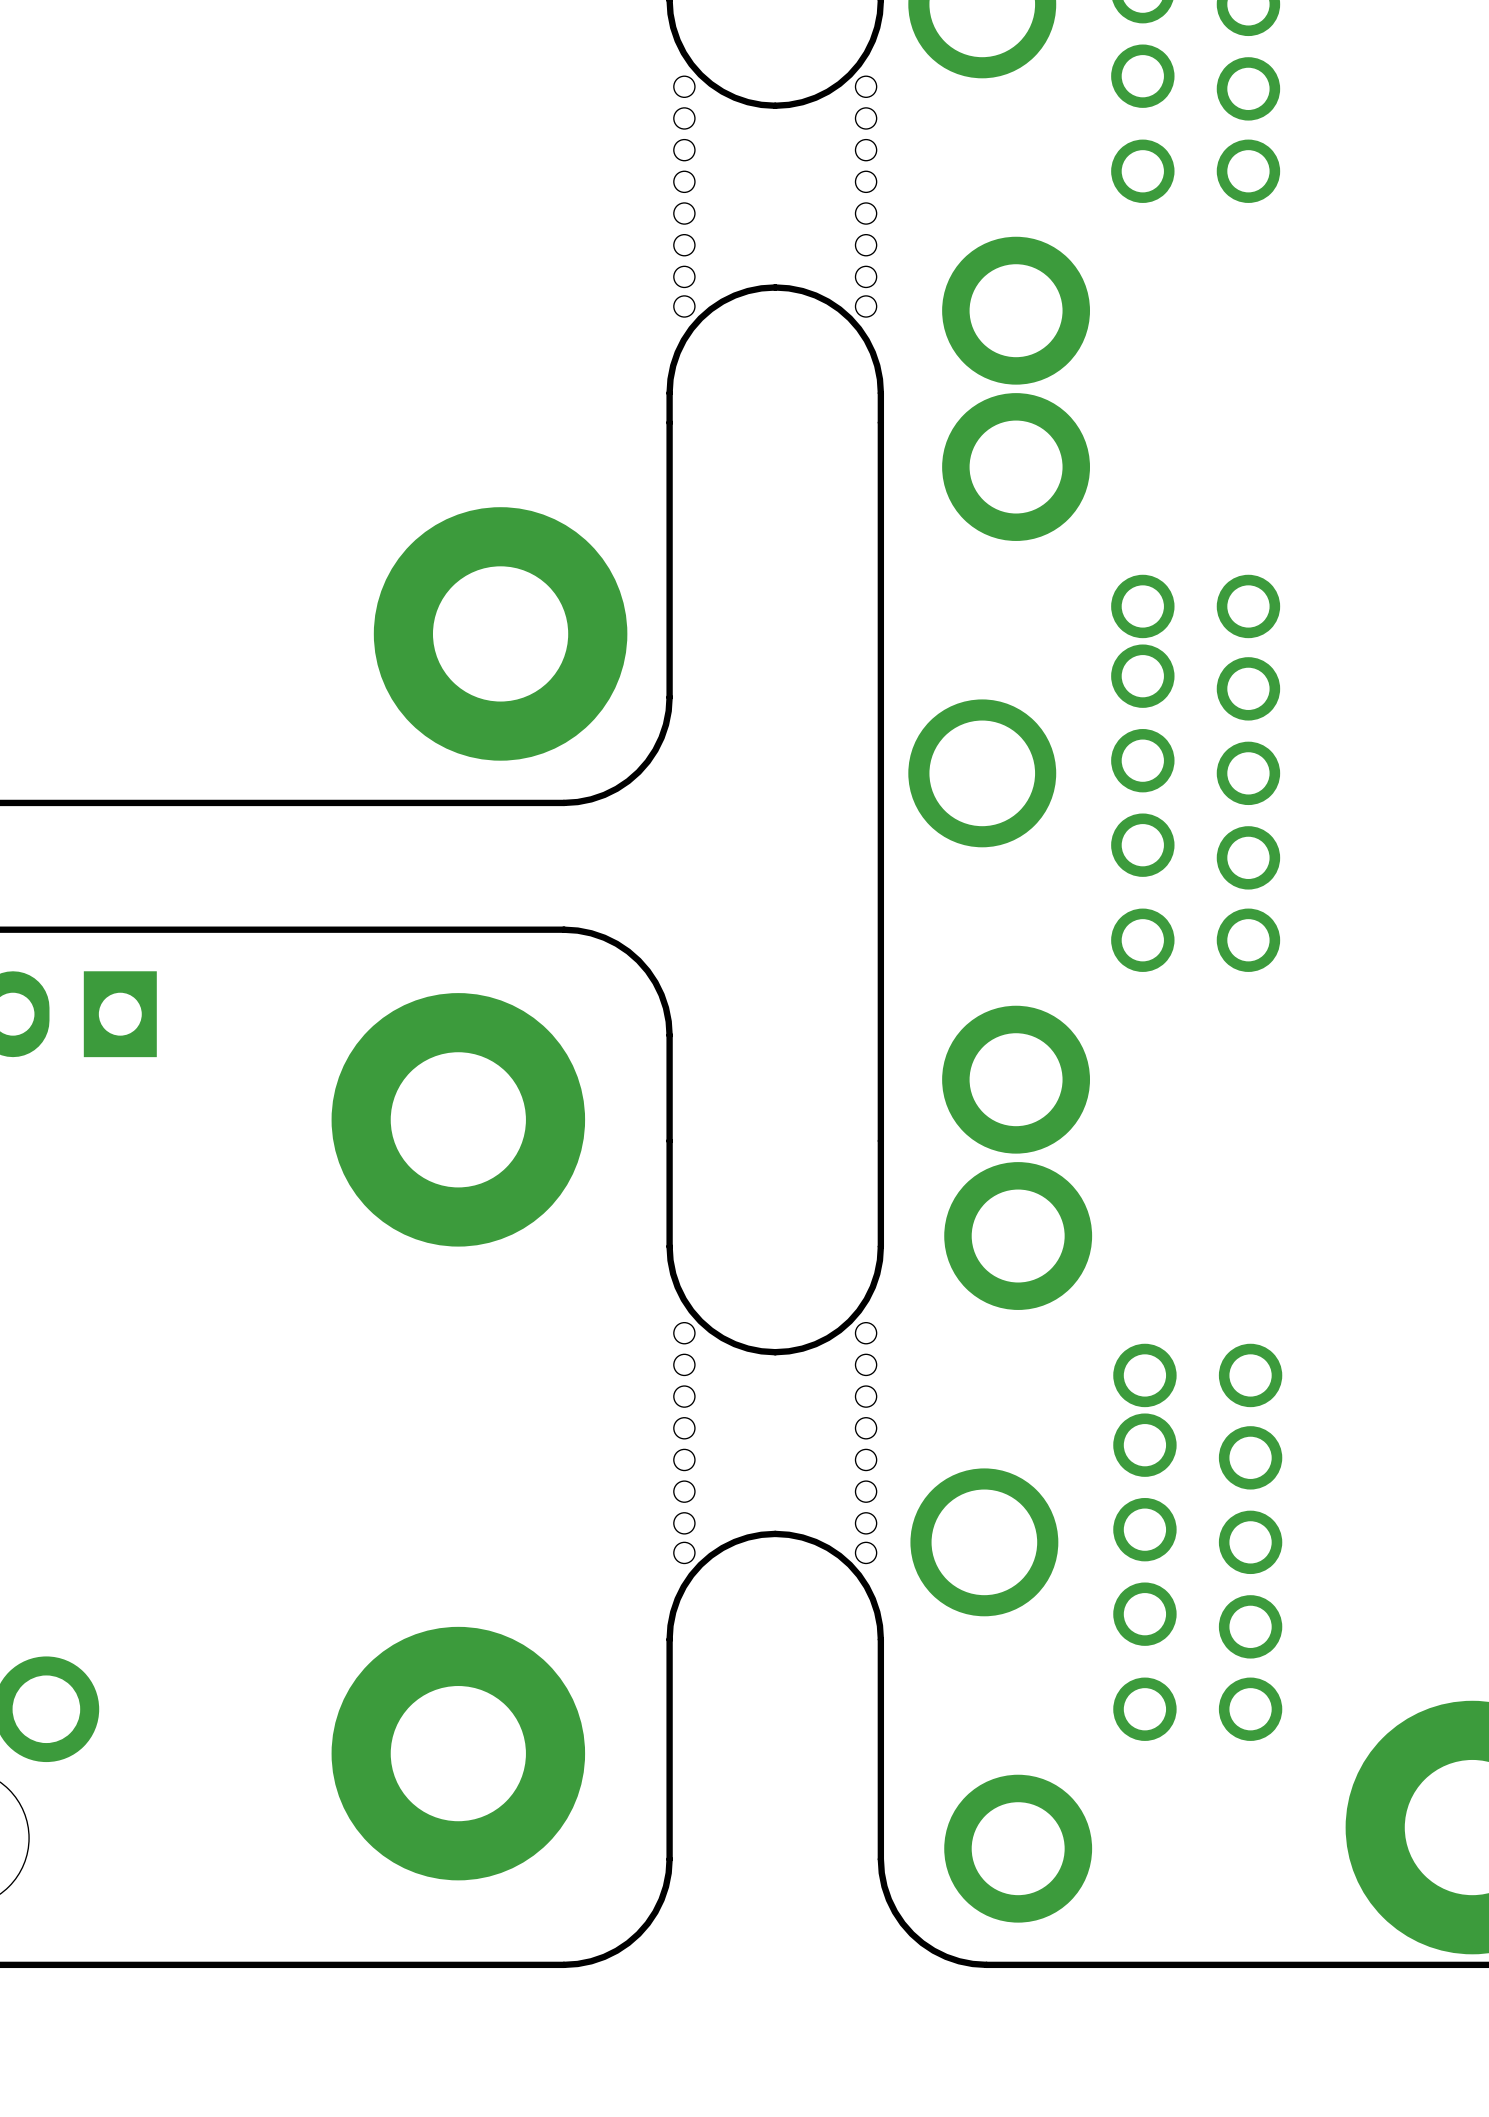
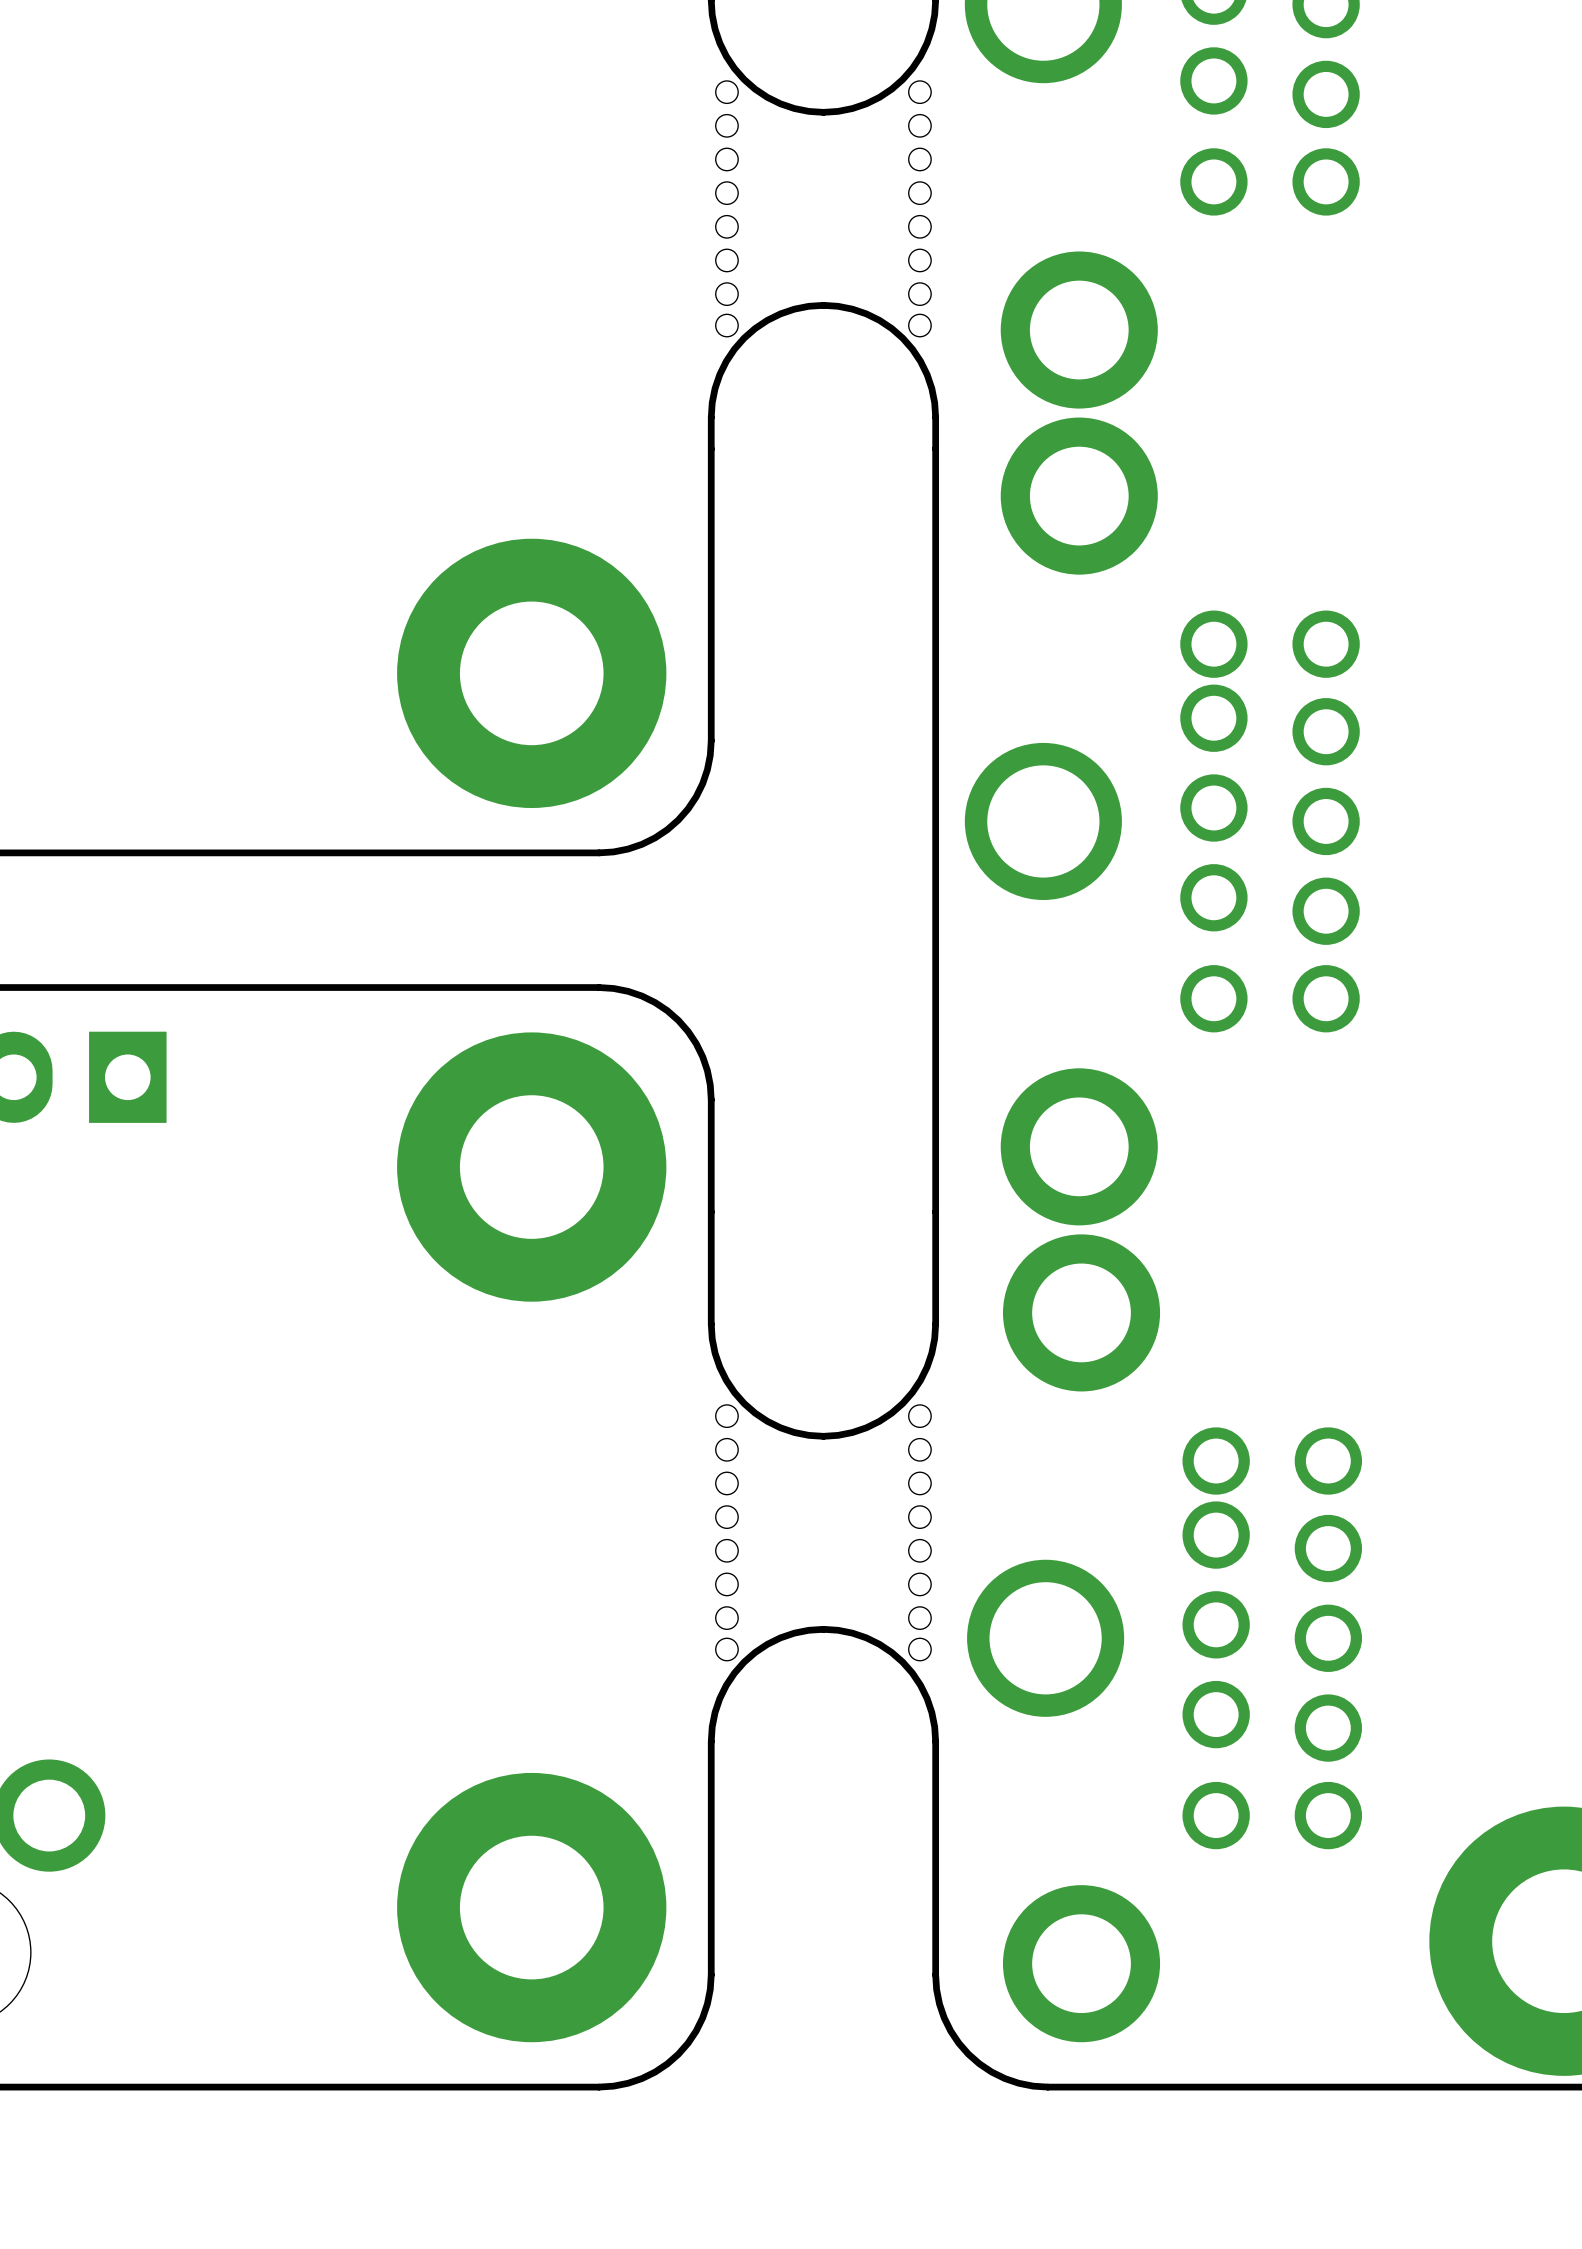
part position: (458, 1119) -> (531, 1167)
part position: (458, 1753) -> (531, 1907)

